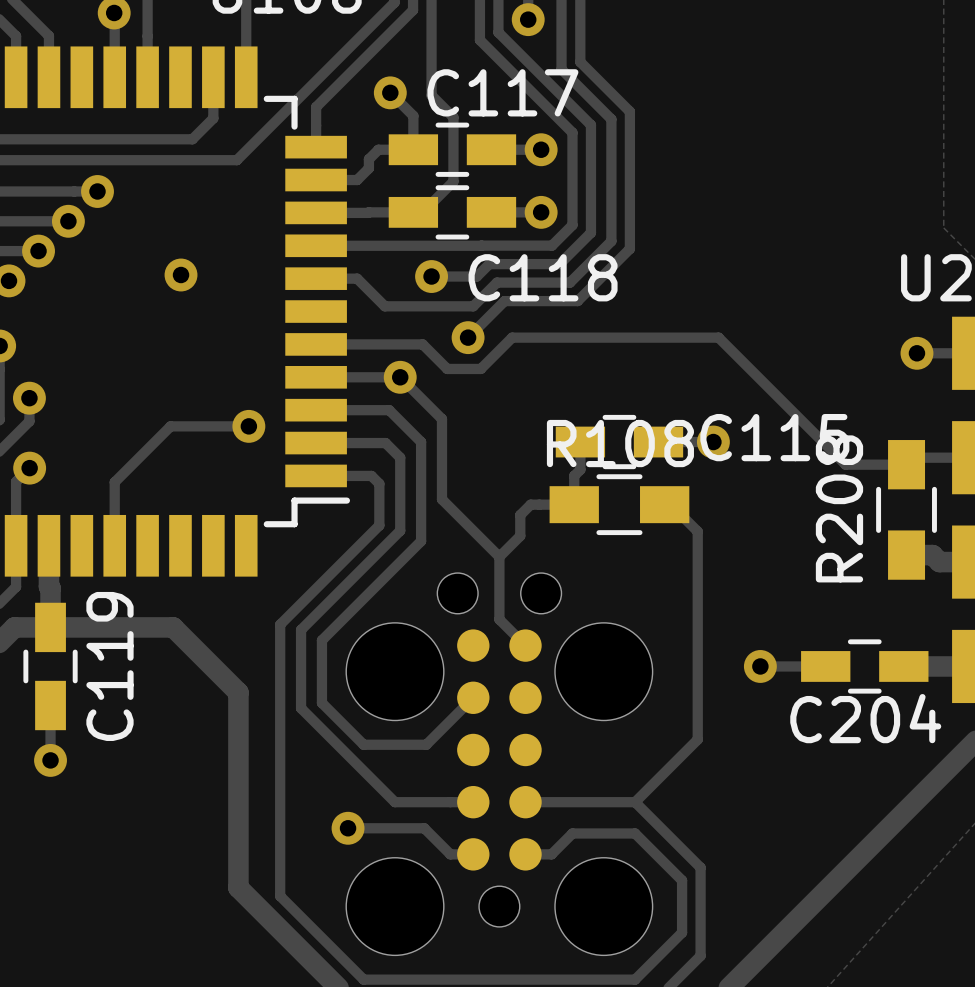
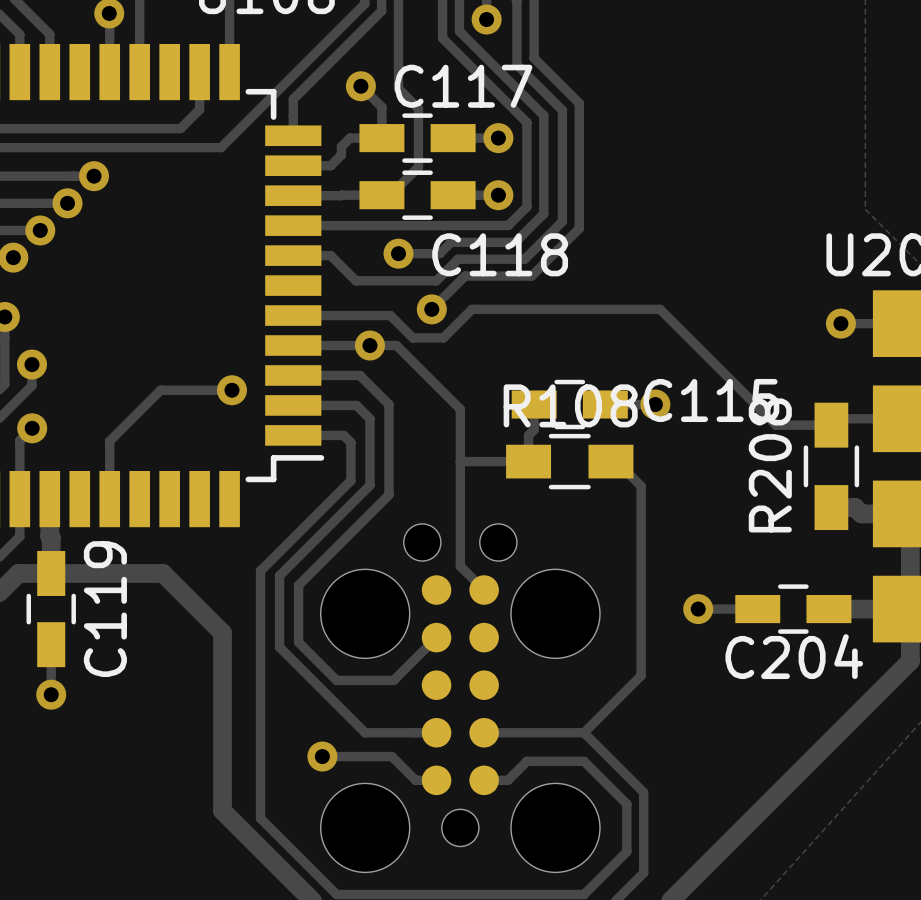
via: (181, 275) -> none
track: (400, 377) (441, 419) (441, 499) (499, 556) (520, 535) (520, 515) (530, 504) -> (369, 345) (396, 345) (460, 409) (460, 509)
track: none -> (460, 461) (488, 461)

